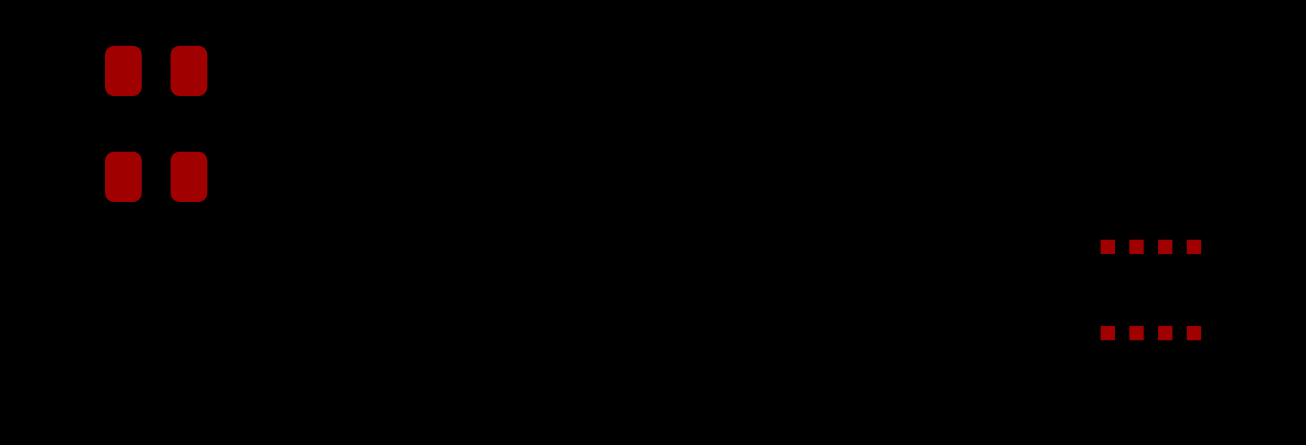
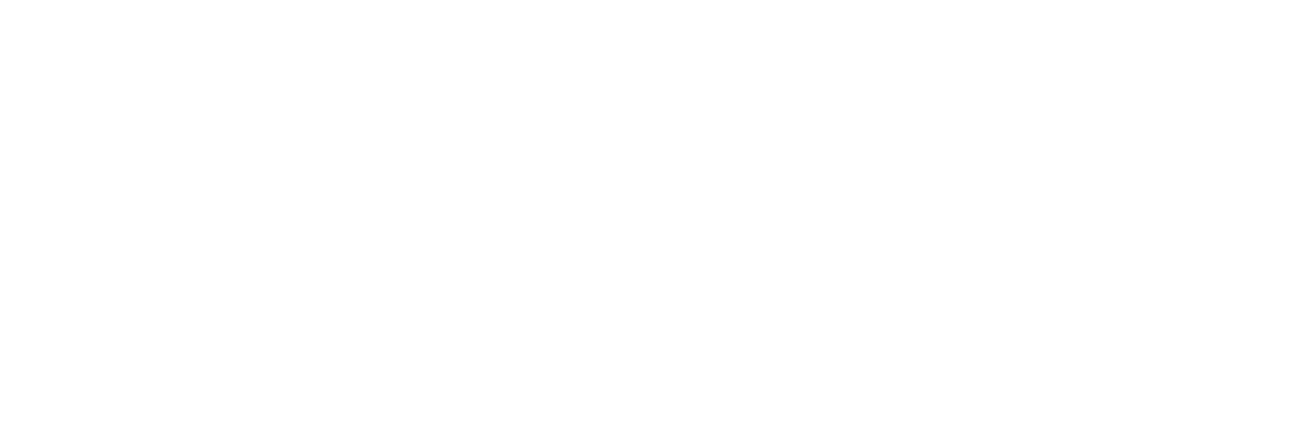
part: (156, 70) -> none
part: (156, 176) -> none
part: (1150, 289) -> none

